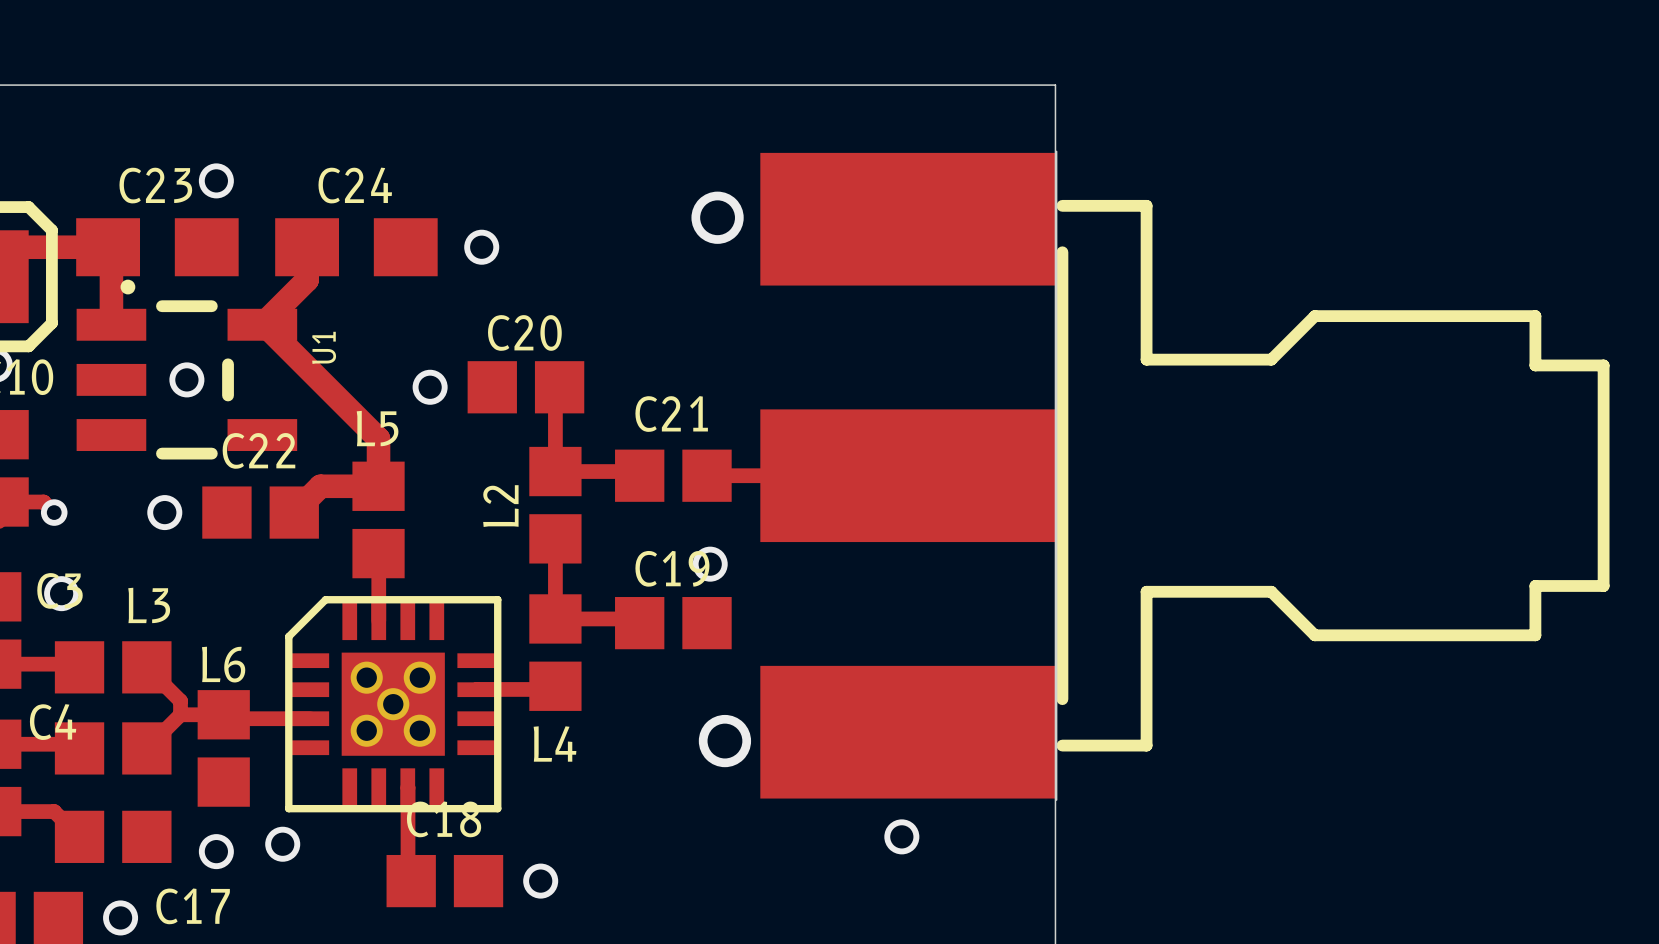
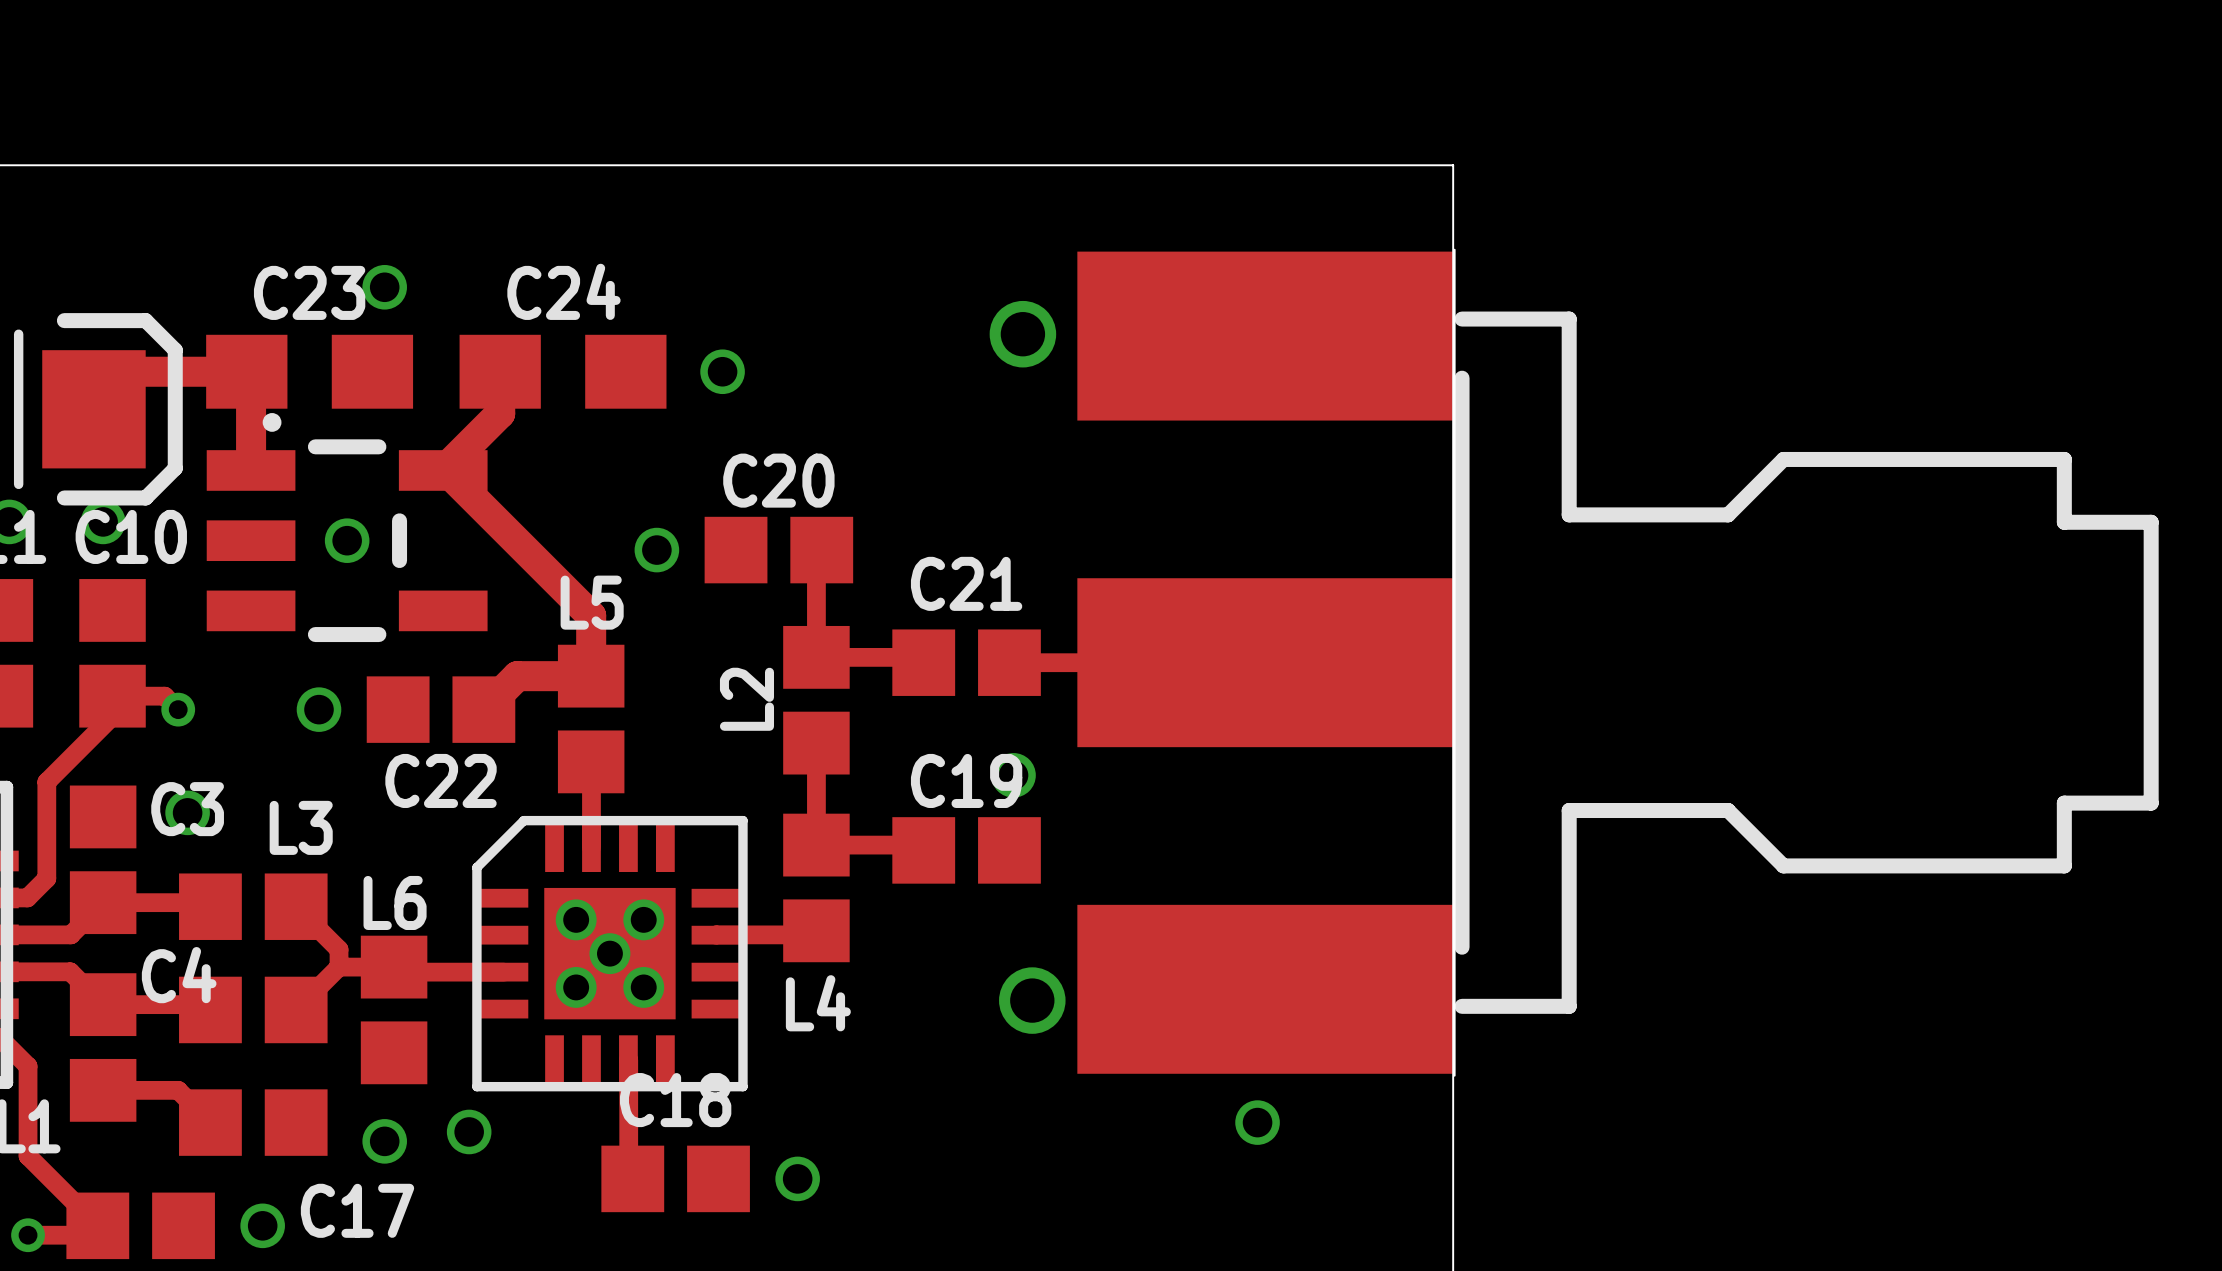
U1 name: U1 (324, 347) -> none
C22 name position: C22 (258, 450) -> C22 (441, 780)

